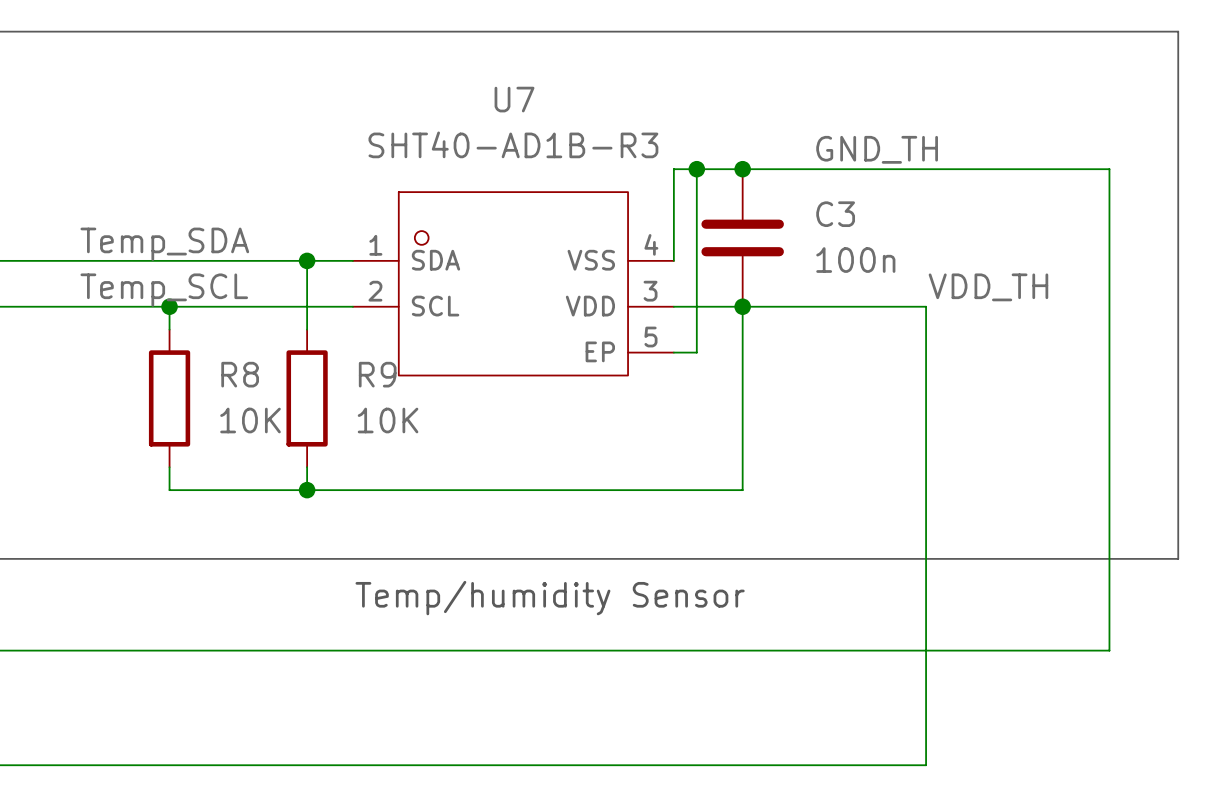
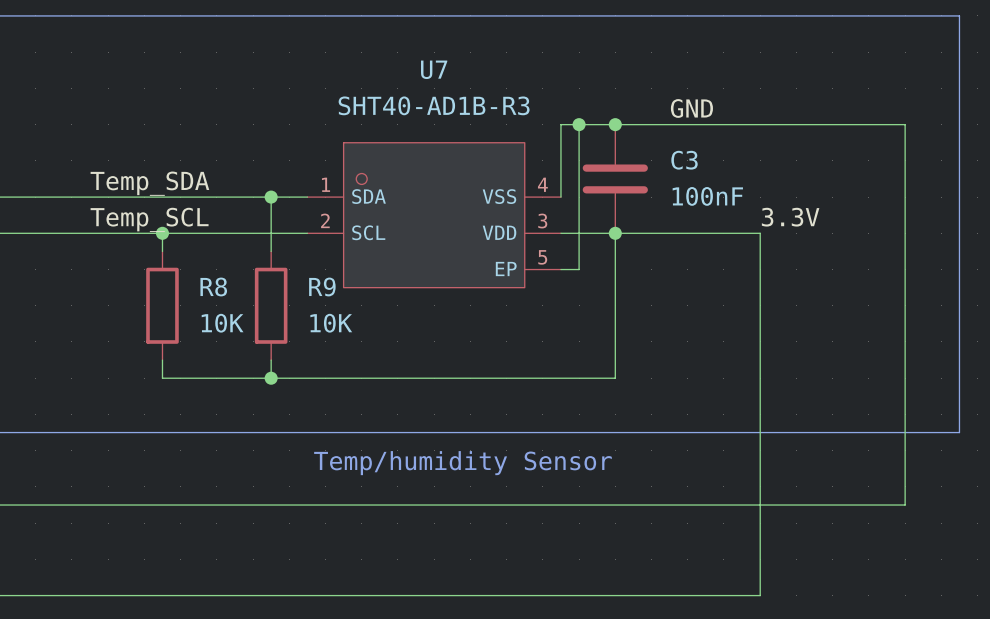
label: GND_TH (877, 149) -> GND (691, 108)
C3 value: 100n (855, 260) -> 100nF (707, 196)
label: VDD_TH (988, 287) -> 3.3V (790, 217)

